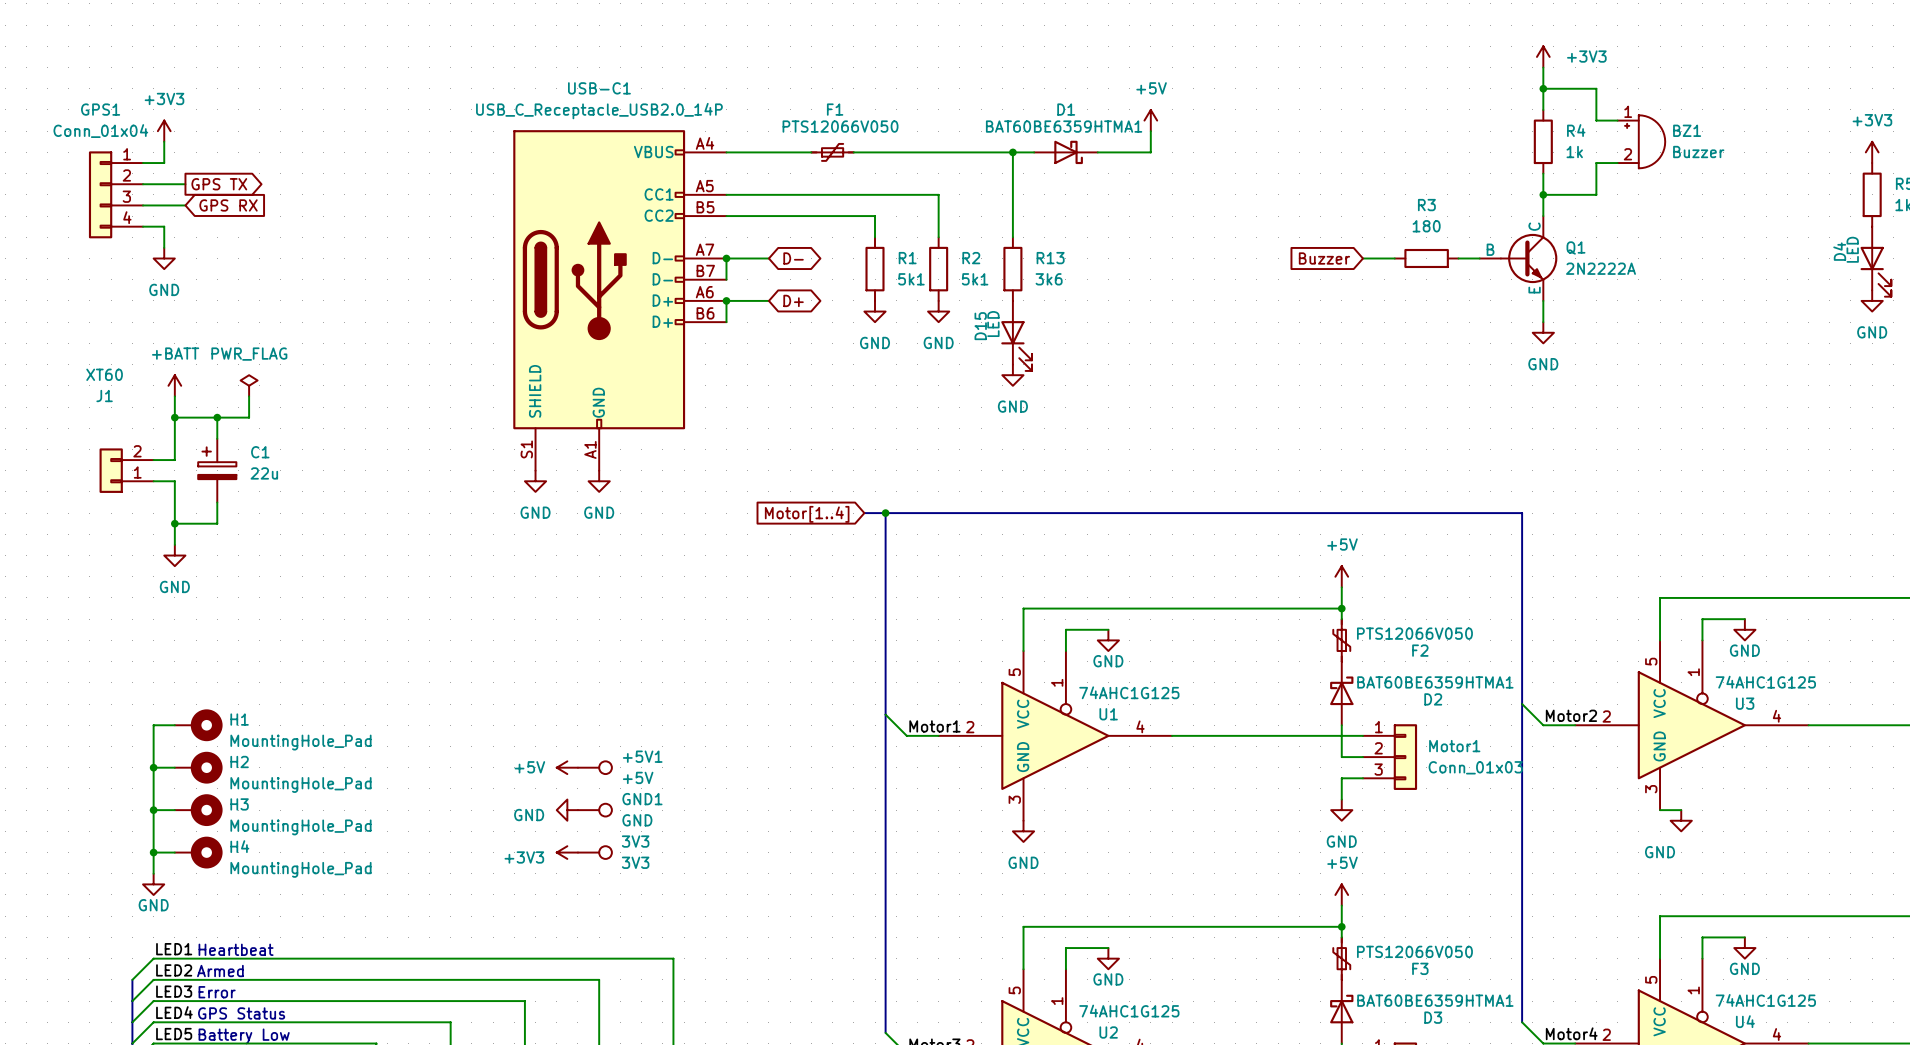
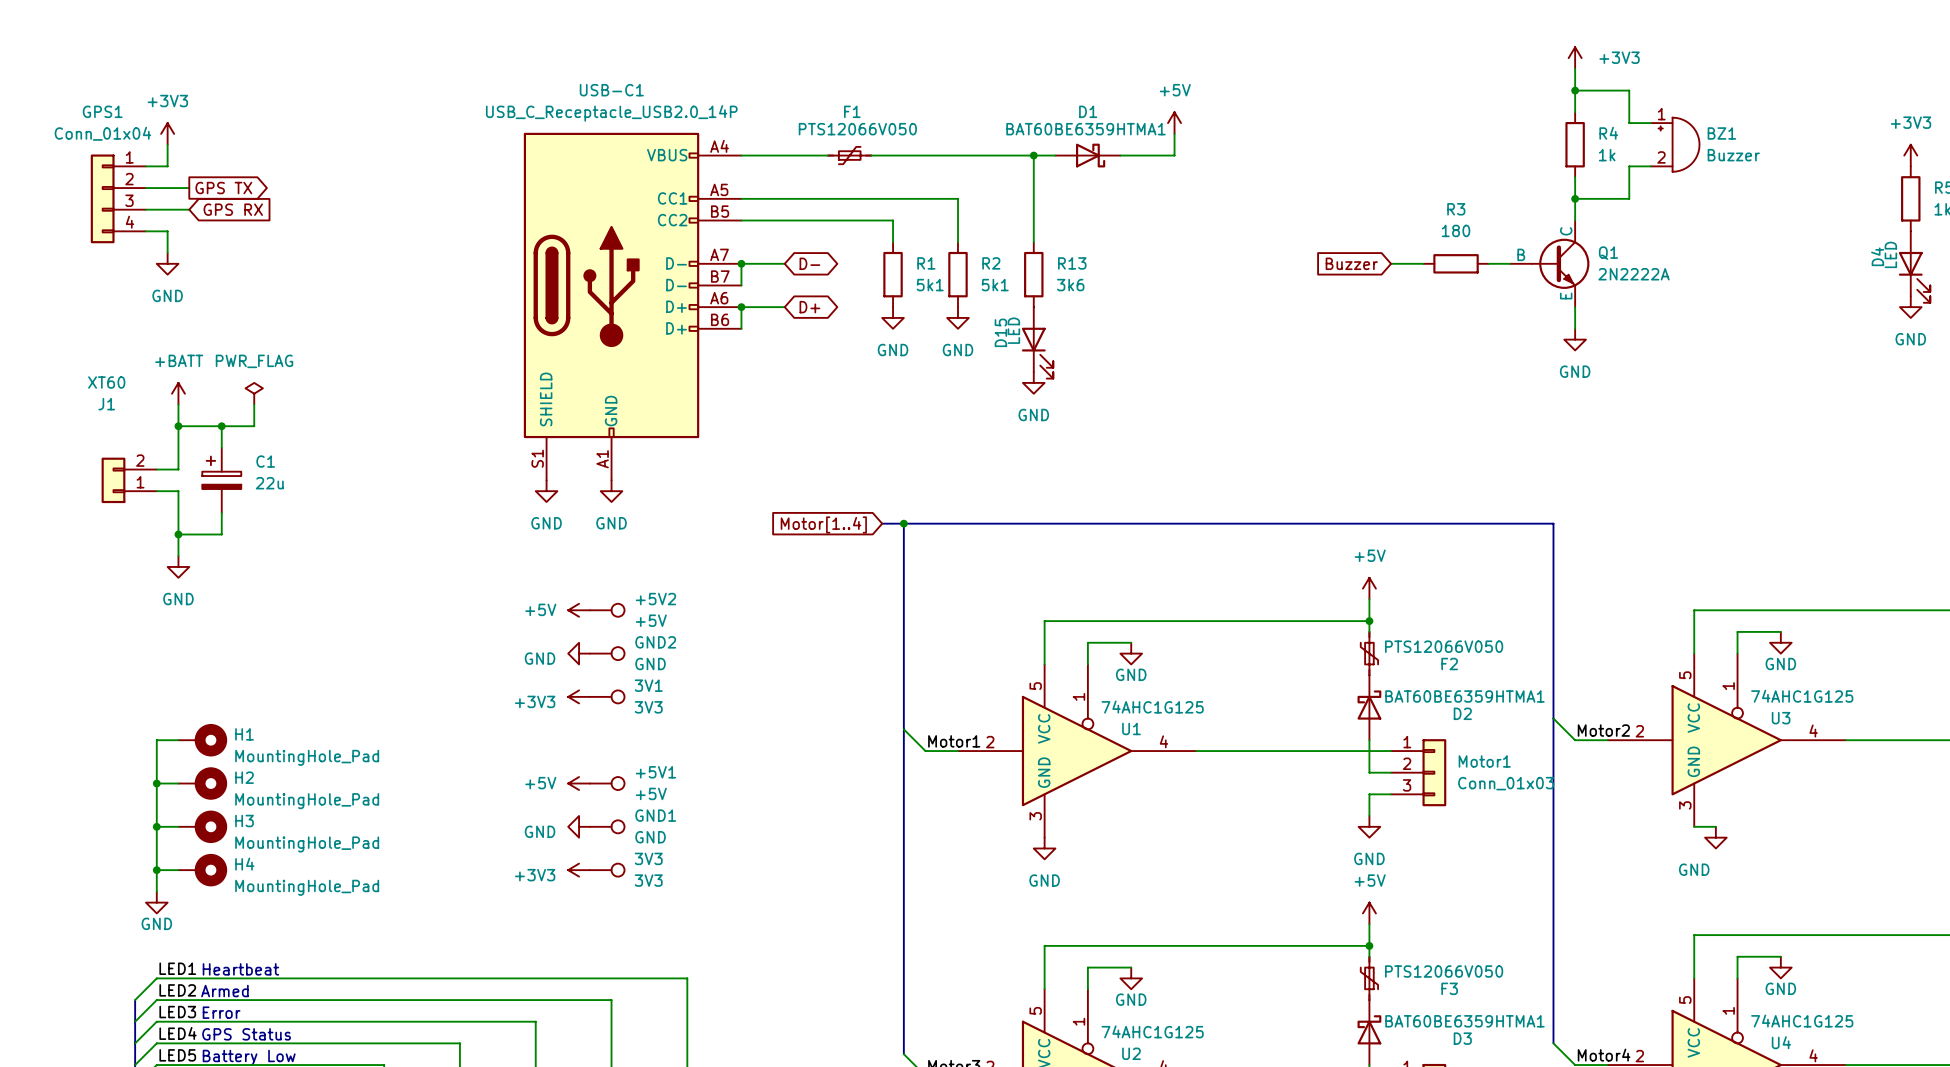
power symbol: none -> +5V (579, 610)
+5V2: none -> +5V (607, 610)
power symbol: none -> GND (579, 653)
GND2: none -> GND (607, 653)
power symbol: none -> +3V3 (579, 696)
3V1: none -> 3V3 (607, 696)

